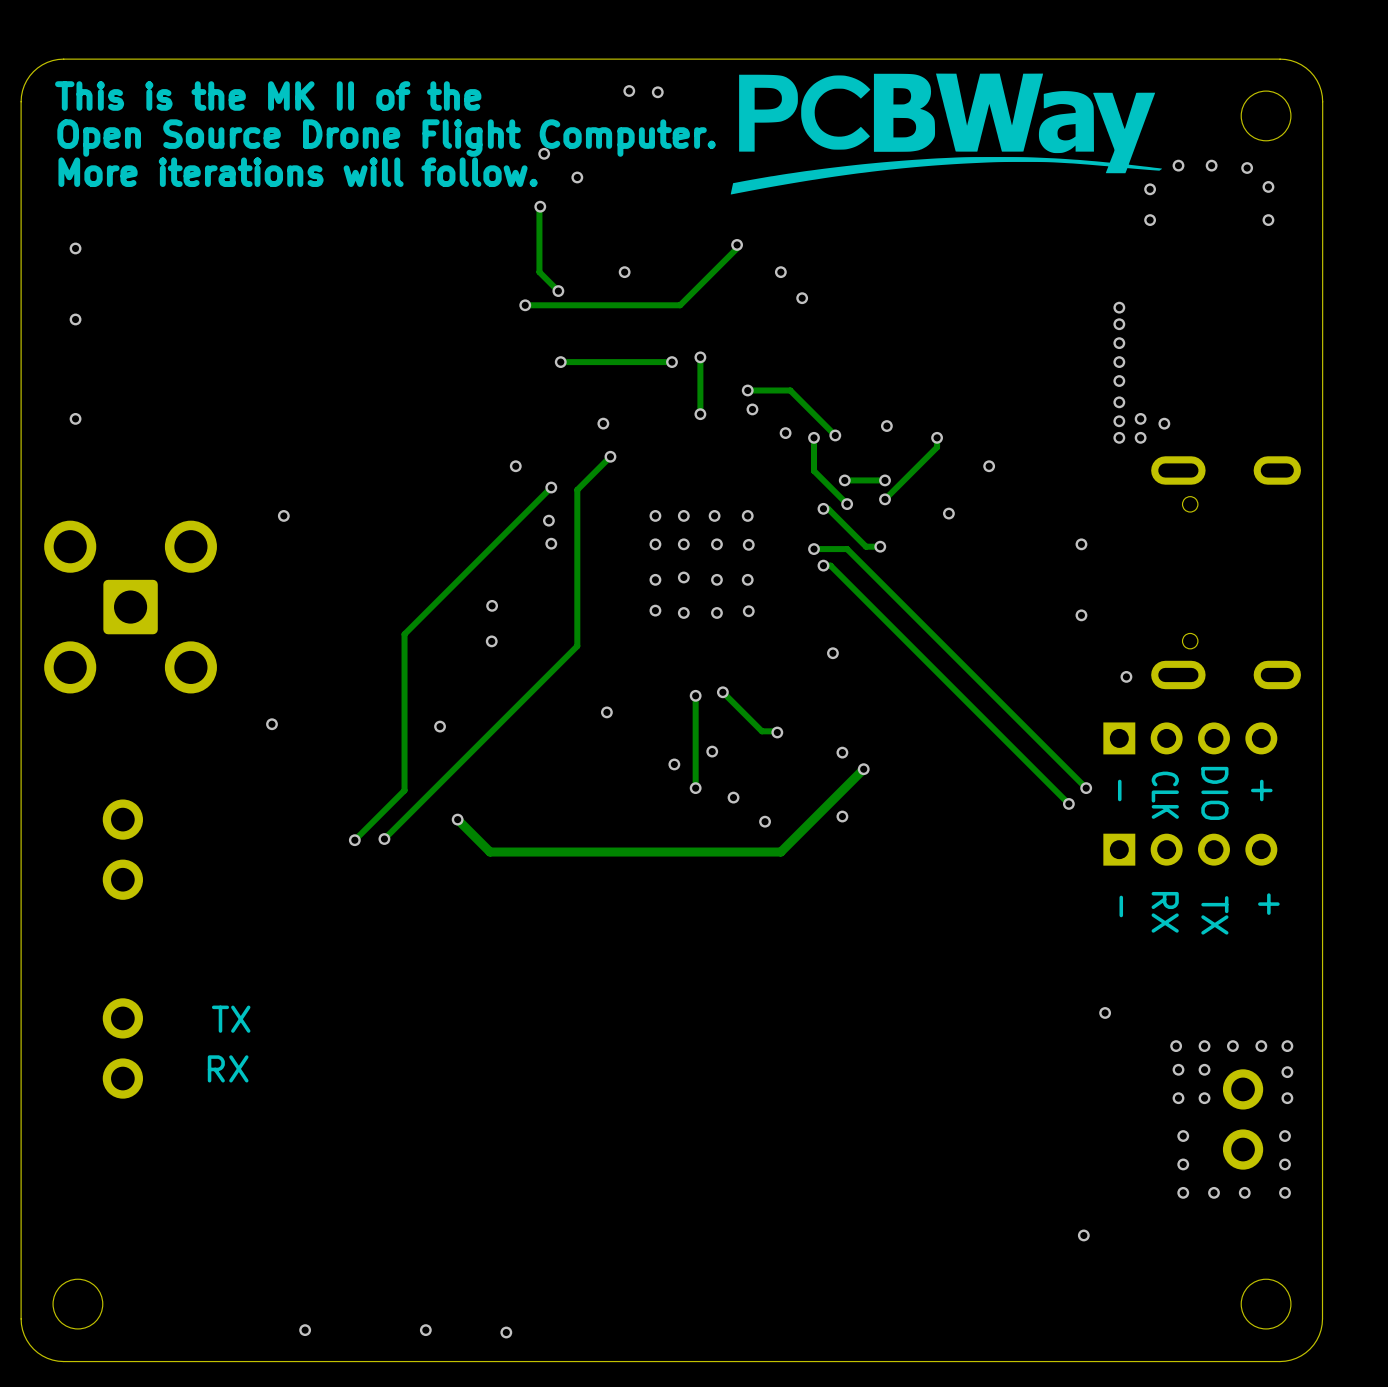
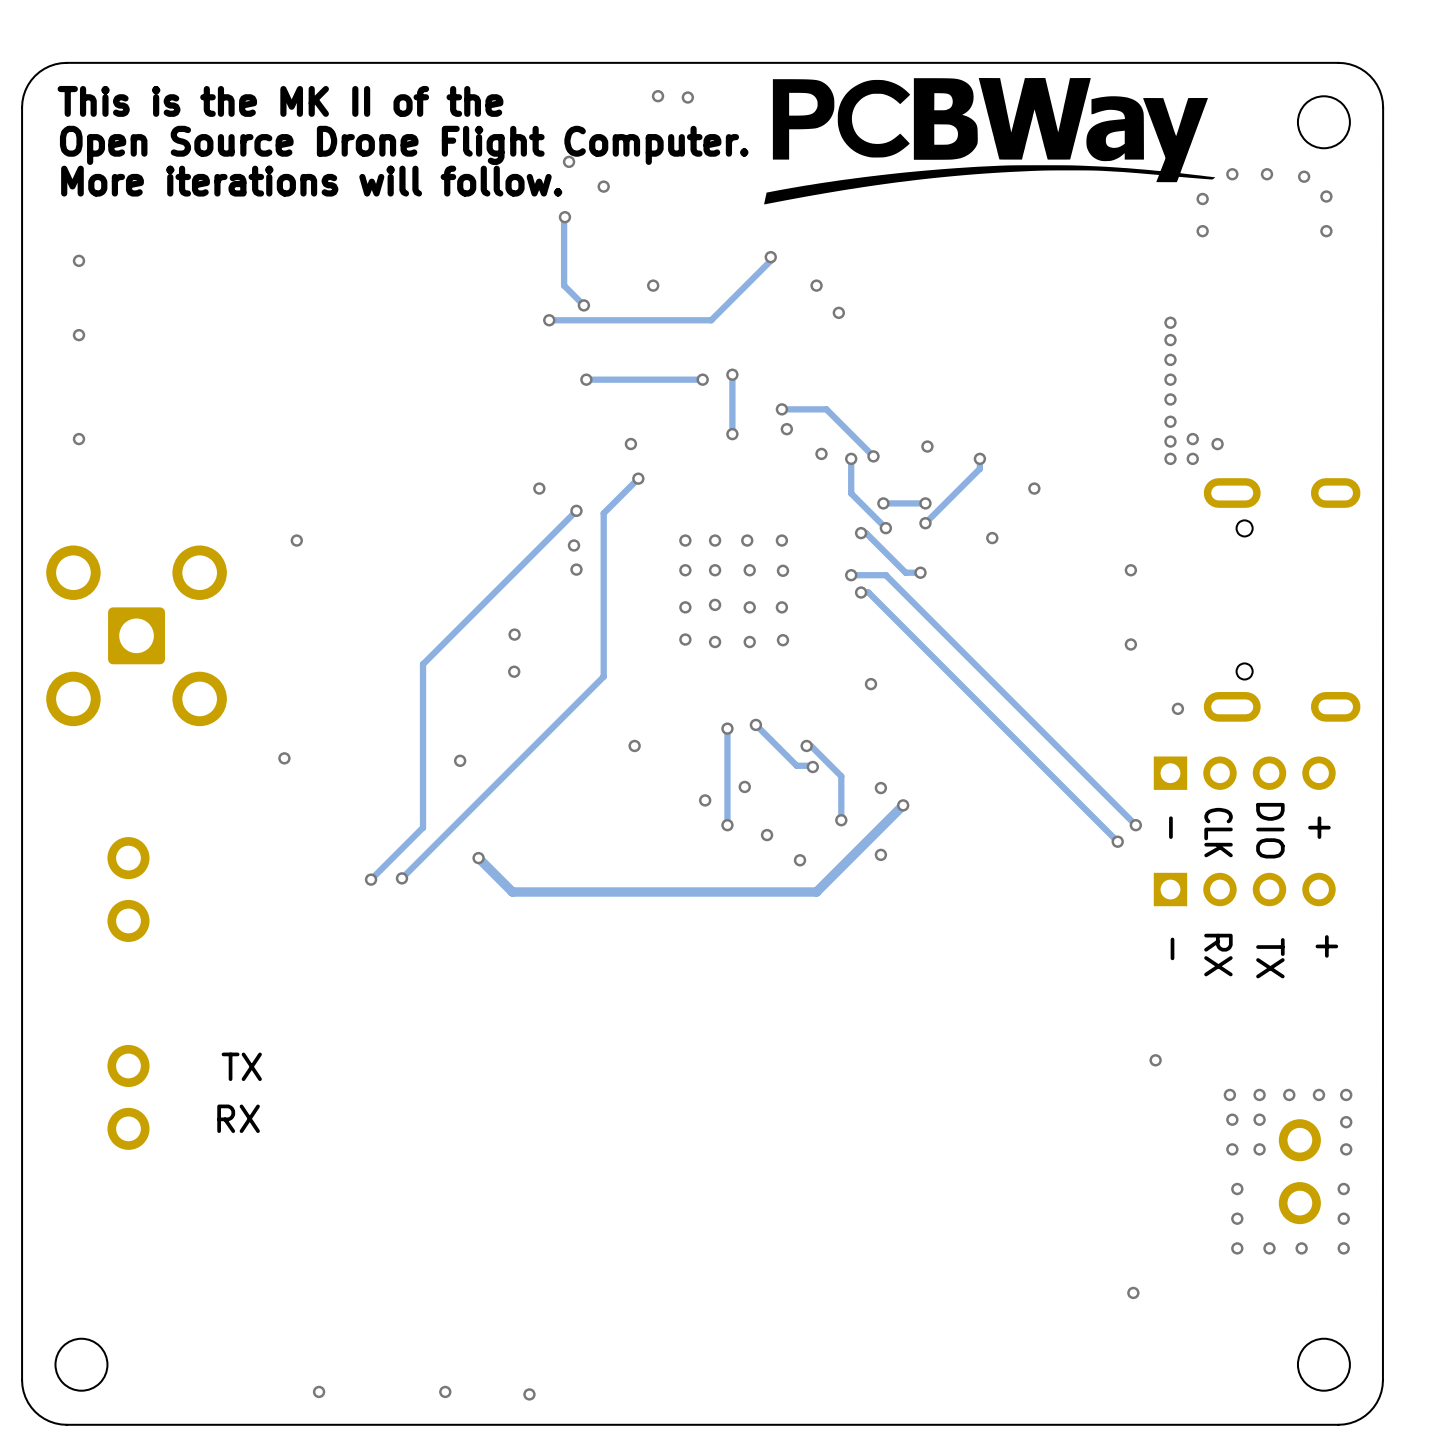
track: none -> (806, 745) (811, 745) (841, 776) (841, 820)
via: none -> (806, 745)
via: none -> (841, 820)

